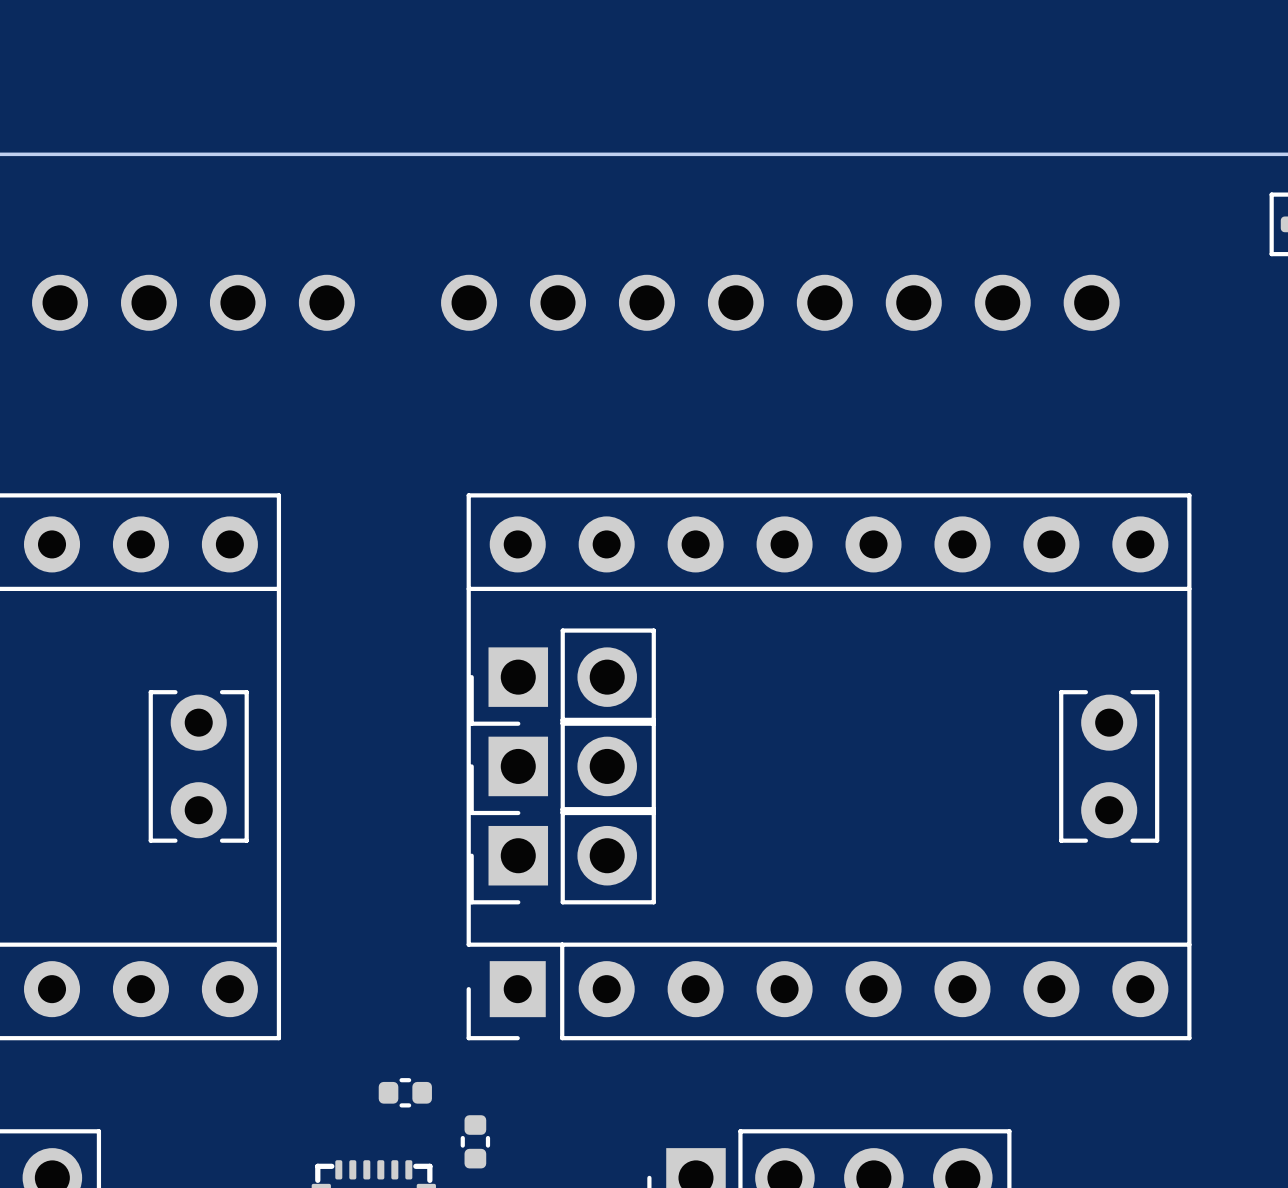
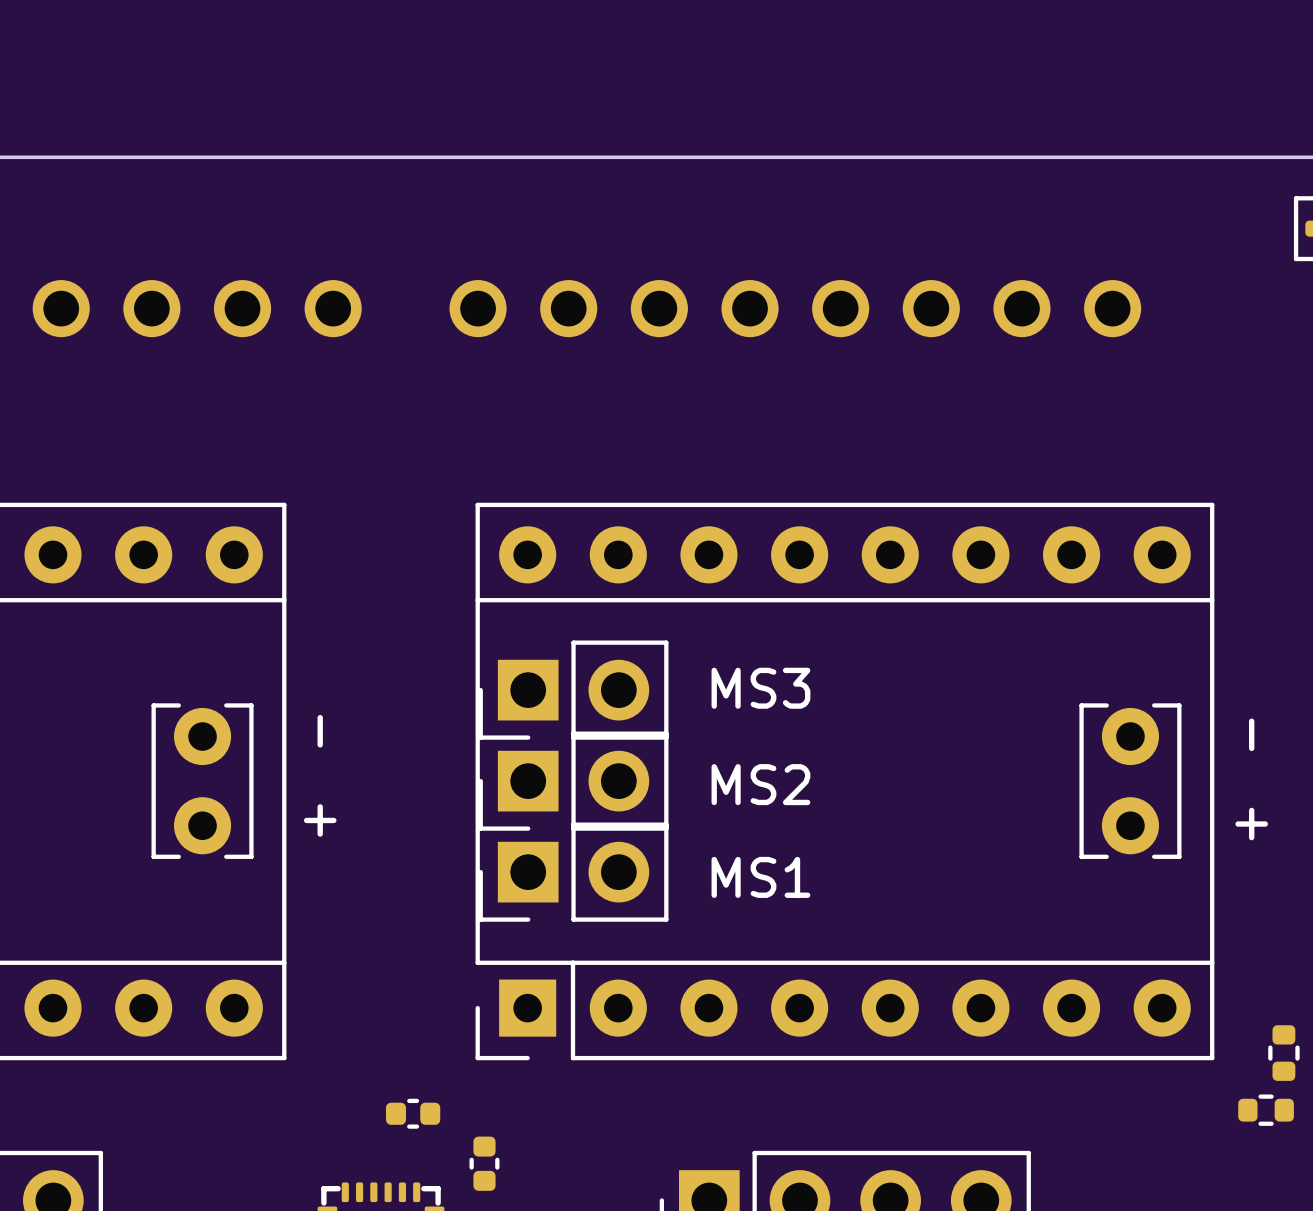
text: none -> MS3 (760, 688)
text: none -> - (320, 731)
text: none -> - (1251, 734)
text: none -> MS2 (760, 784)
text: none -> + (320, 820)
text: none -> + (1251, 824)
text: none -> MS1 (760, 877)
part: none -> (1283, 1053)
part: none -> (1266, 1110)

